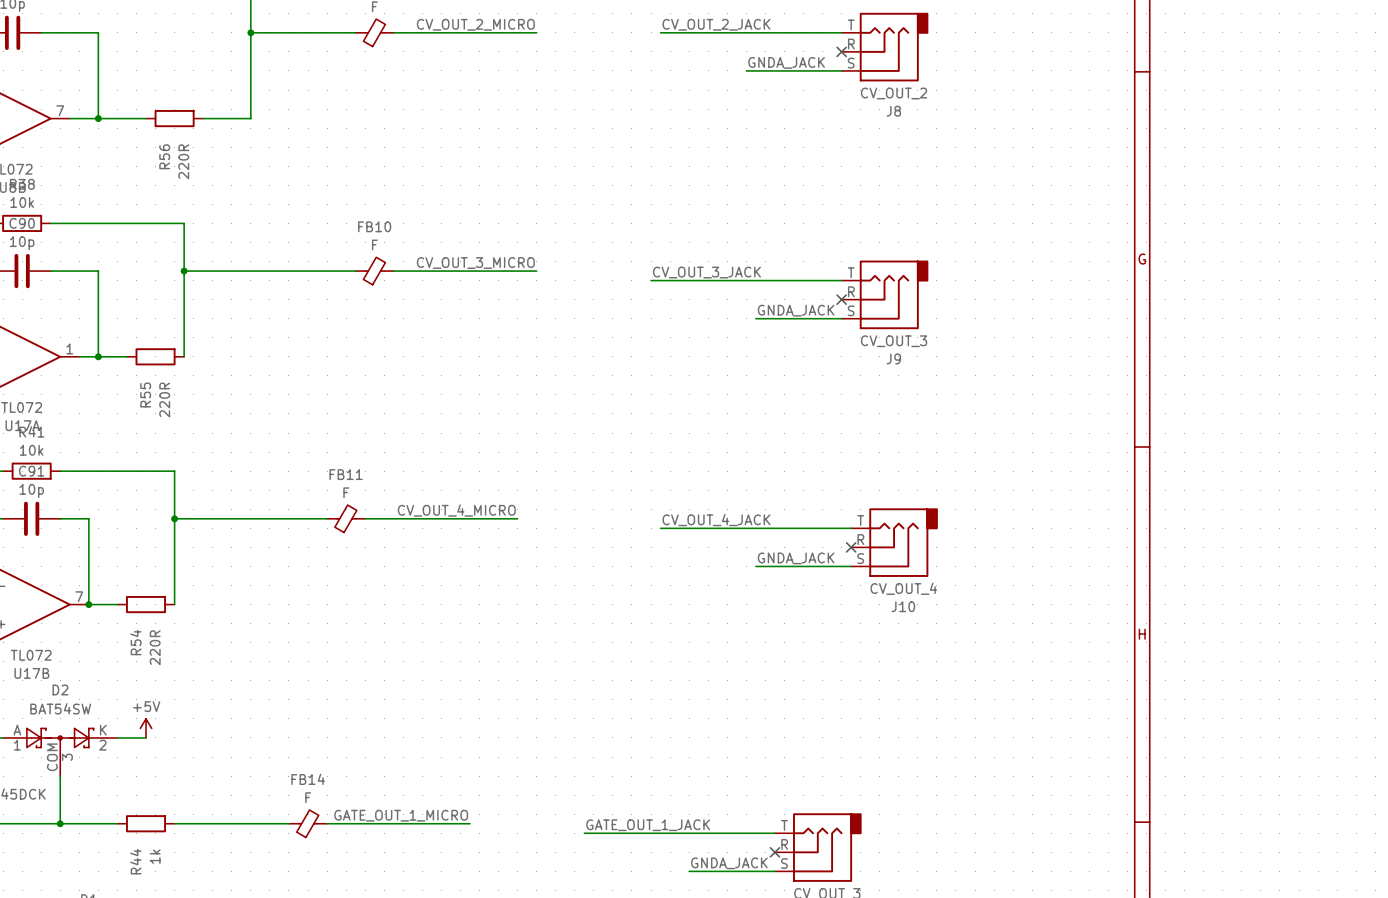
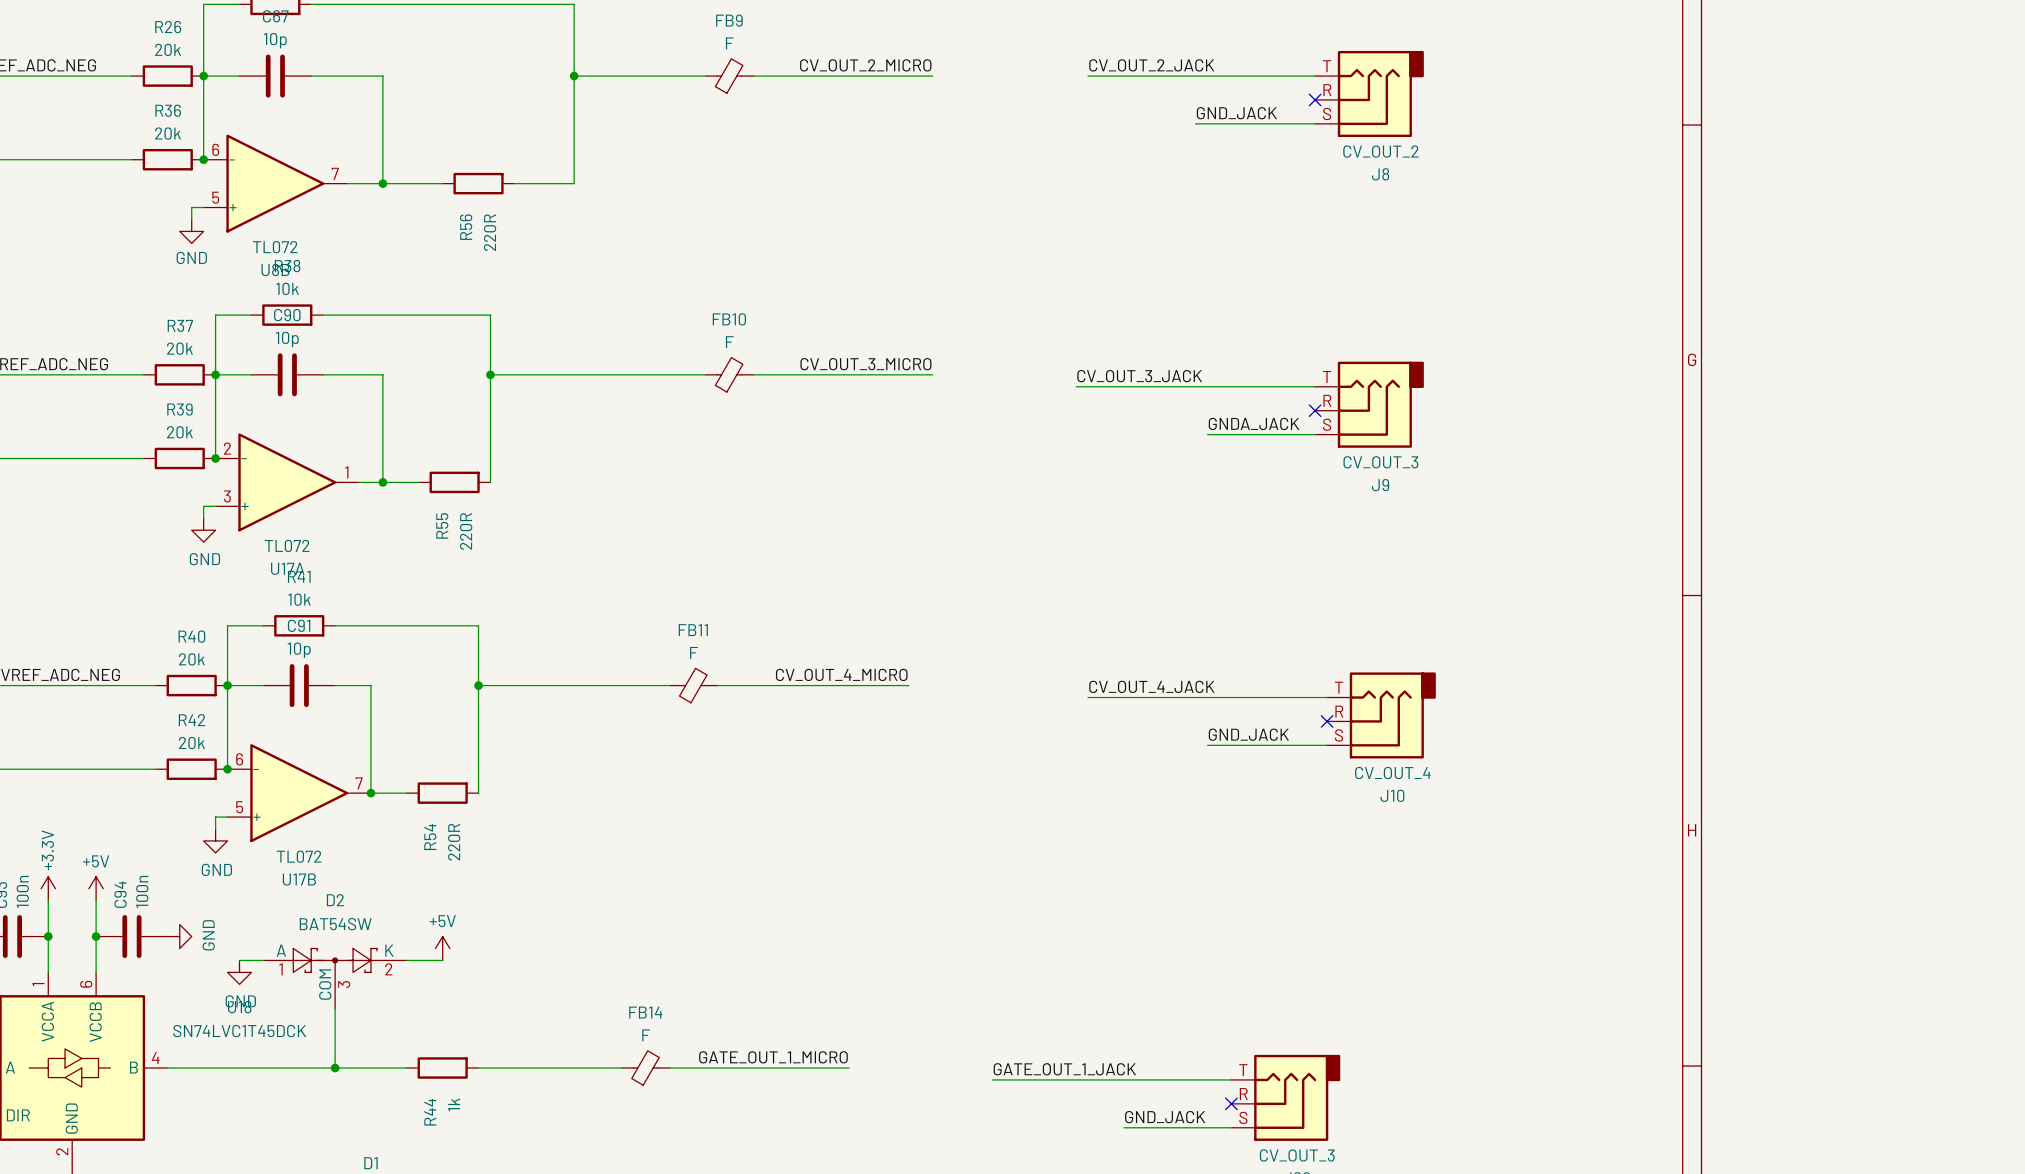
label: GNDA_JACK (786, 62) -> GND_JACK (1236, 113)
label: GNDA_JACK (796, 558) -> GND_JACK (1248, 734)
label: GNDA_JACK (729, 863) -> GND_JACK (1165, 1117)

